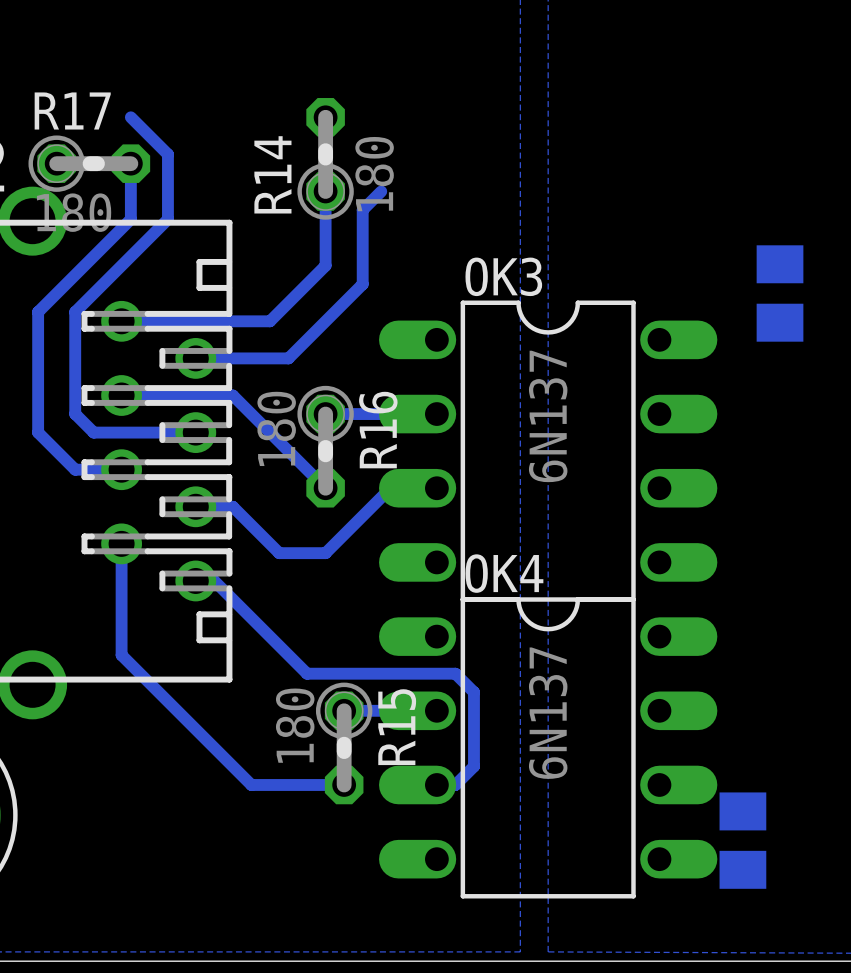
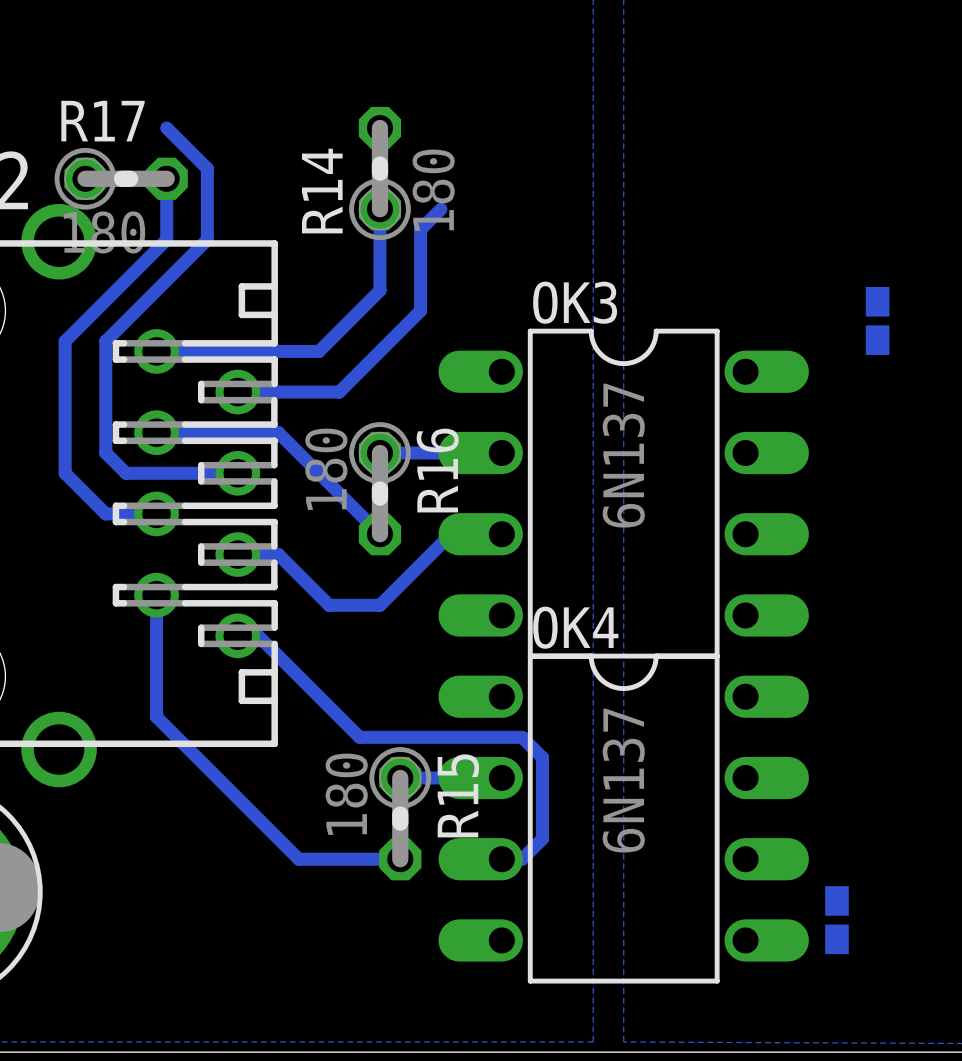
part footprint: [756, 245, 804, 342] -> [865, 286, 890, 355]
part footprint: [719, 792, 767, 889] -> [825, 886, 849, 955]

